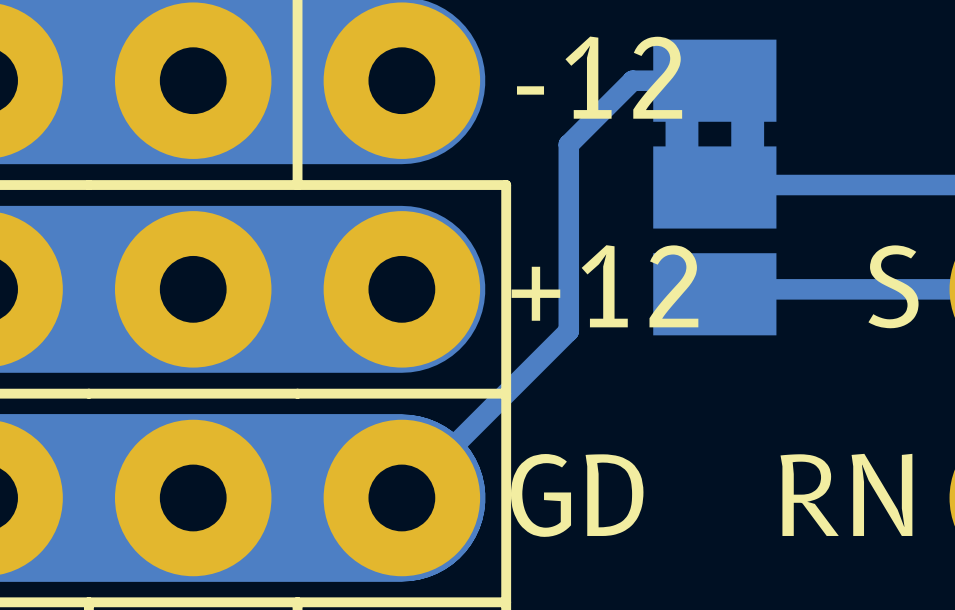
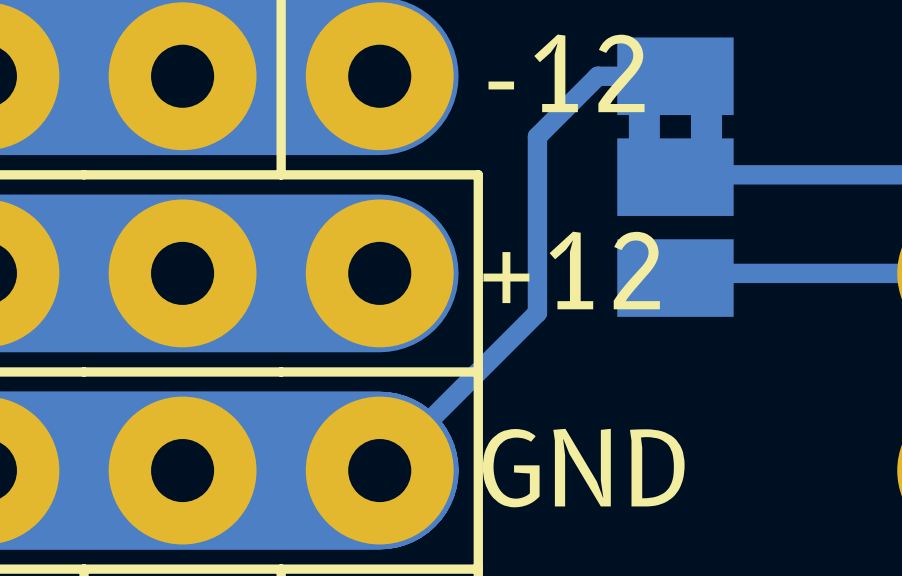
text: S (893, 286) -> none
text: RN (846, 494) -> none
text: GD (577, 495) -> GND (583, 468)

